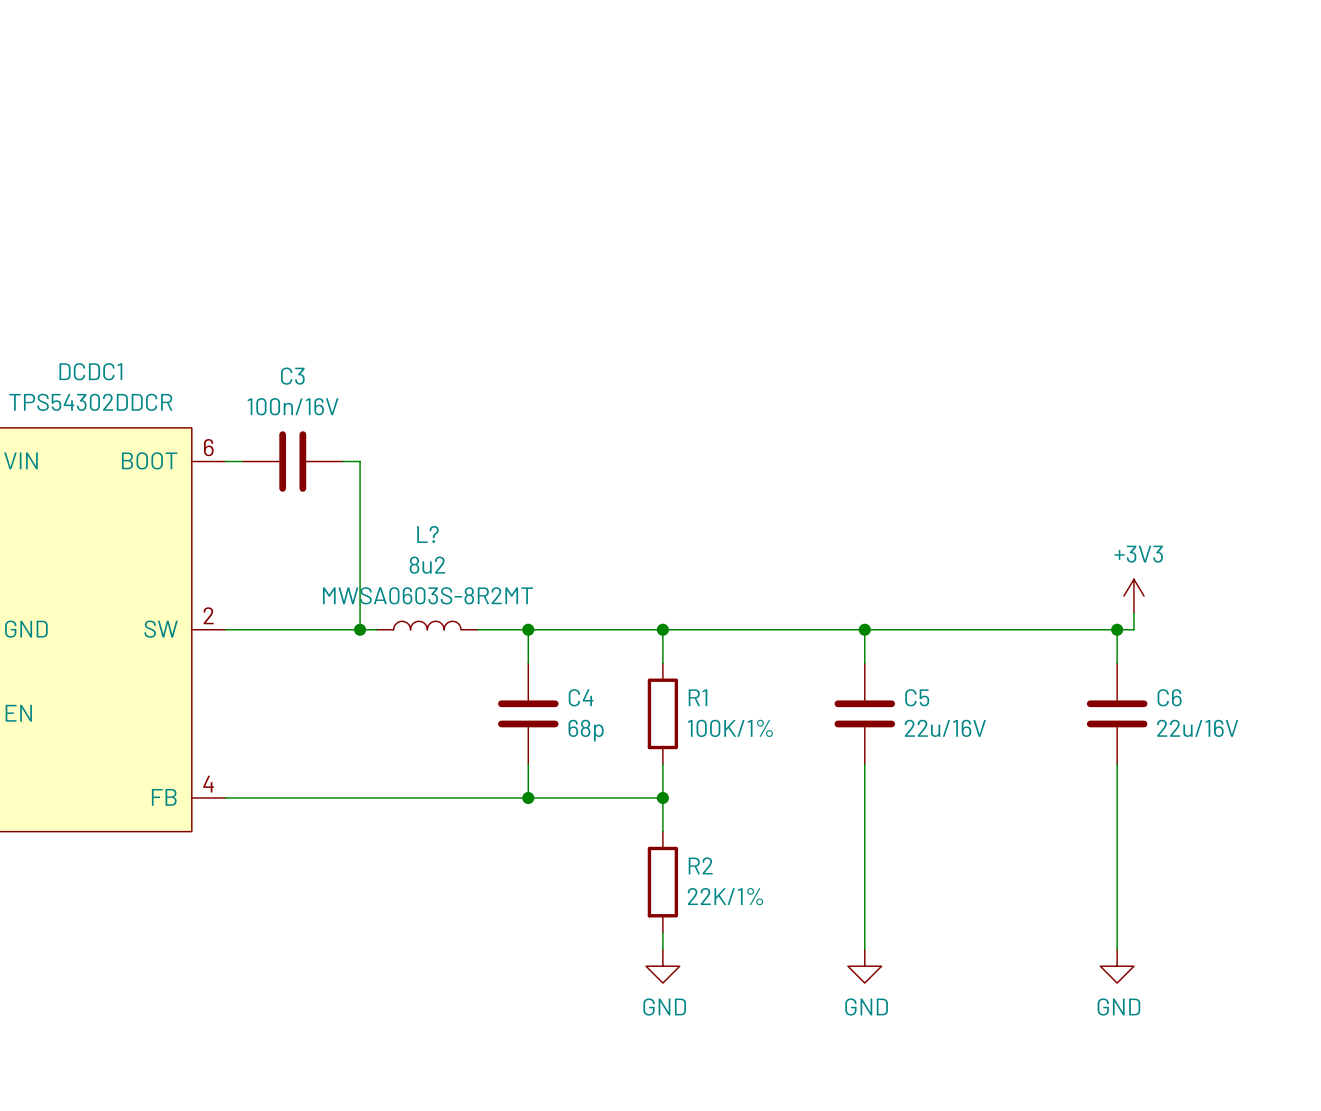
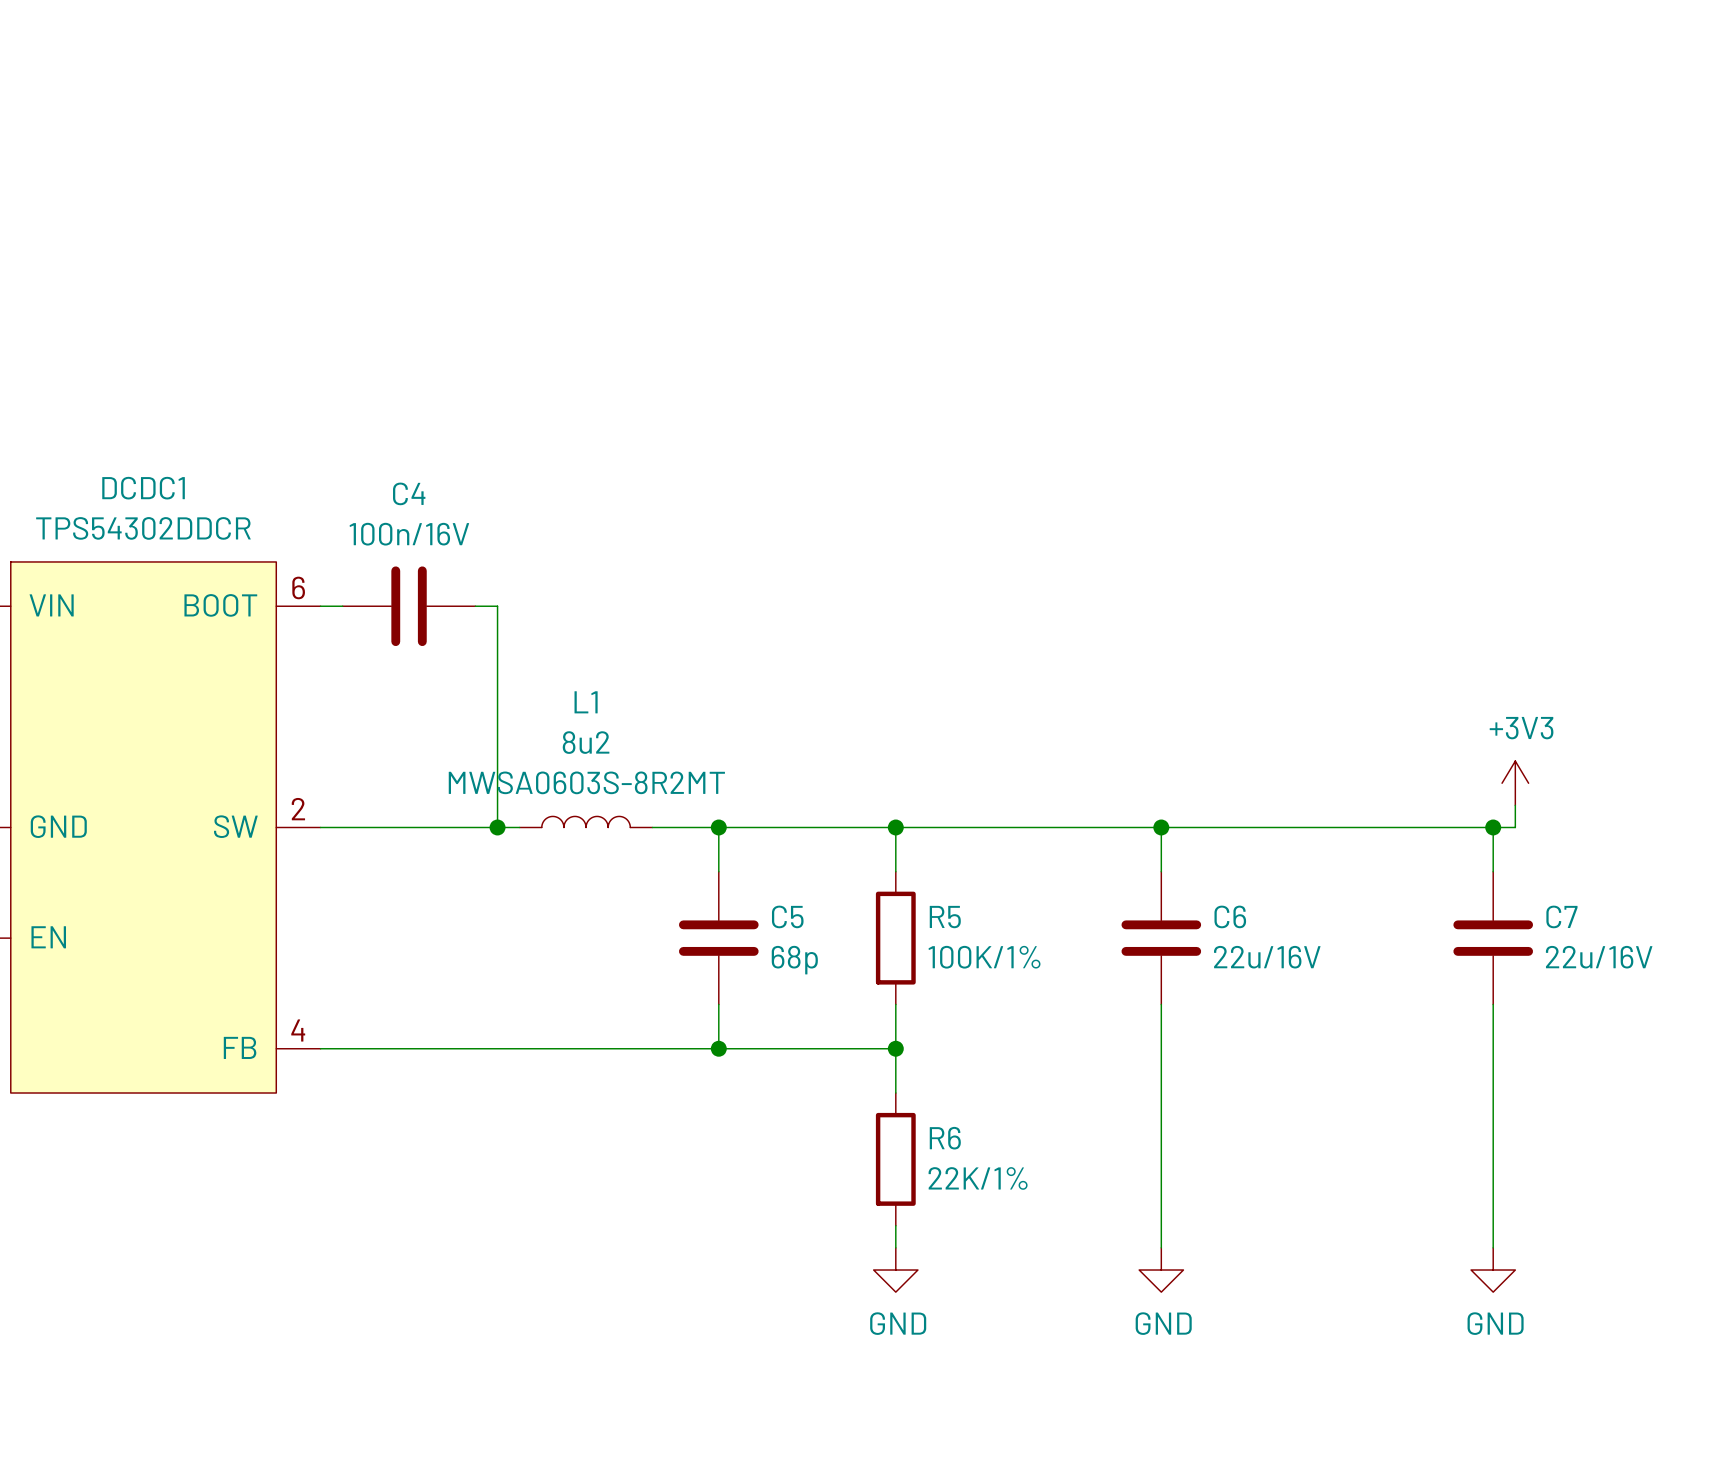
C3 name: C3 (292, 376) -> C4 (409, 493)
L? name: L? (427, 534) -> L1 (586, 702)
C4 name: C4 (581, 697) -> C5 (787, 916)
R1 name: R1 (698, 697) -> R5 (945, 917)
C5 name: C5 (917, 697) -> C6 (1230, 916)
C6 name: C6 (1169, 697) -> C7 (1561, 916)
R2 name: R2 (700, 865) -> R6 (945, 1138)

